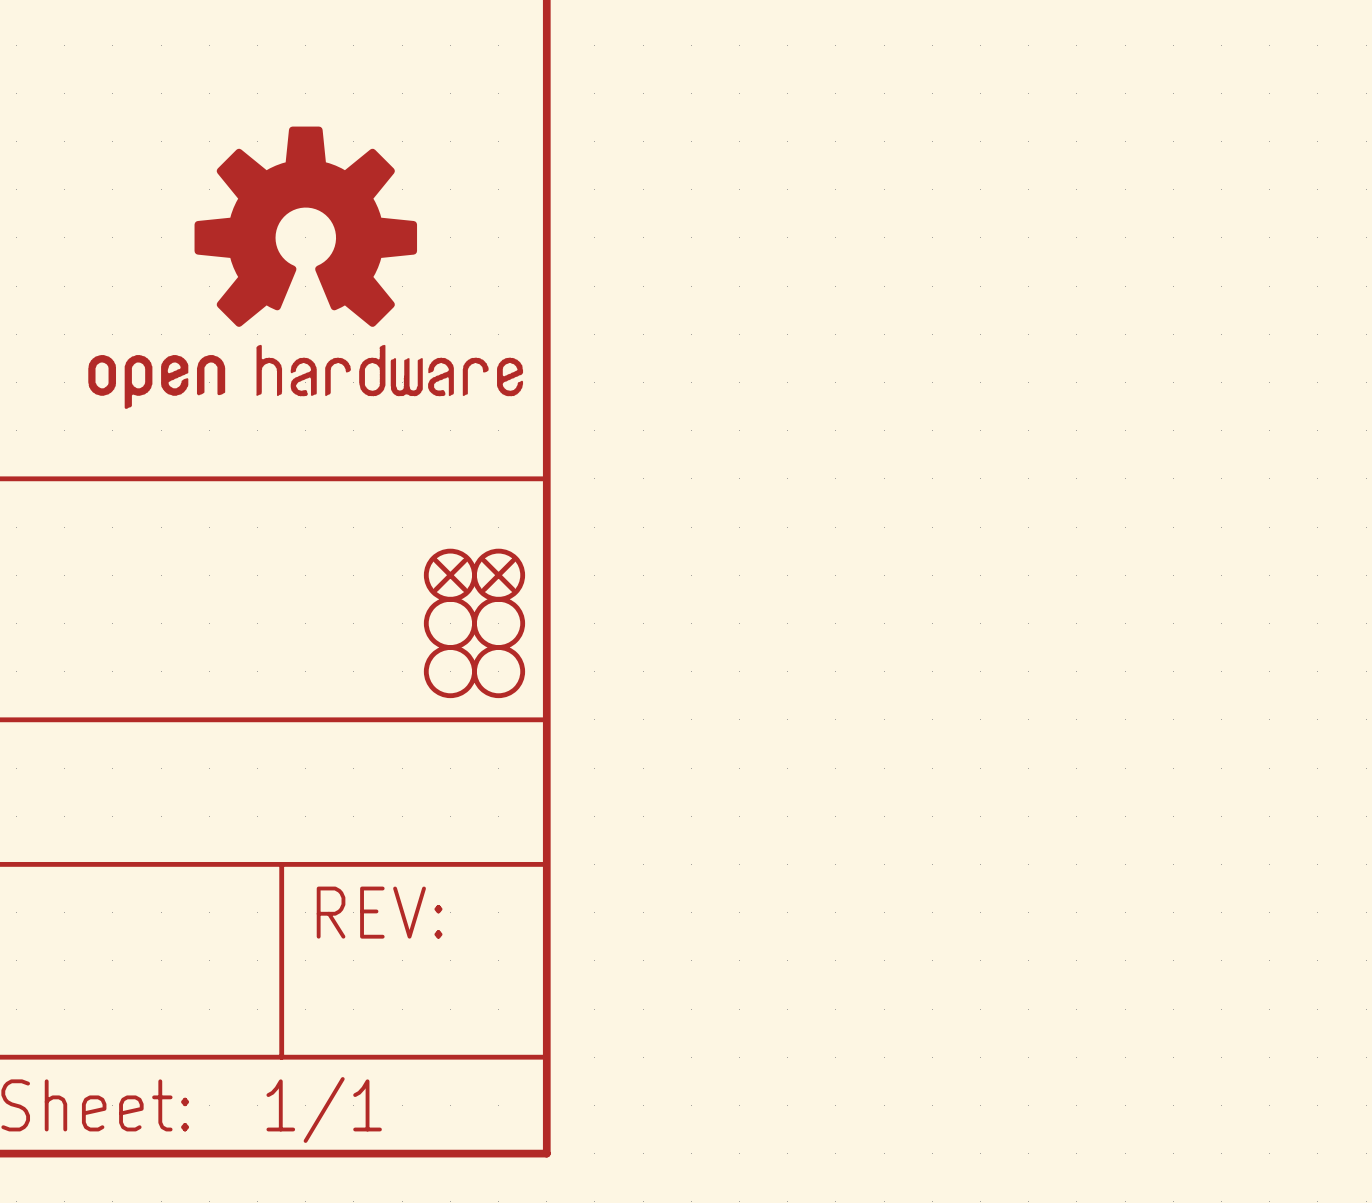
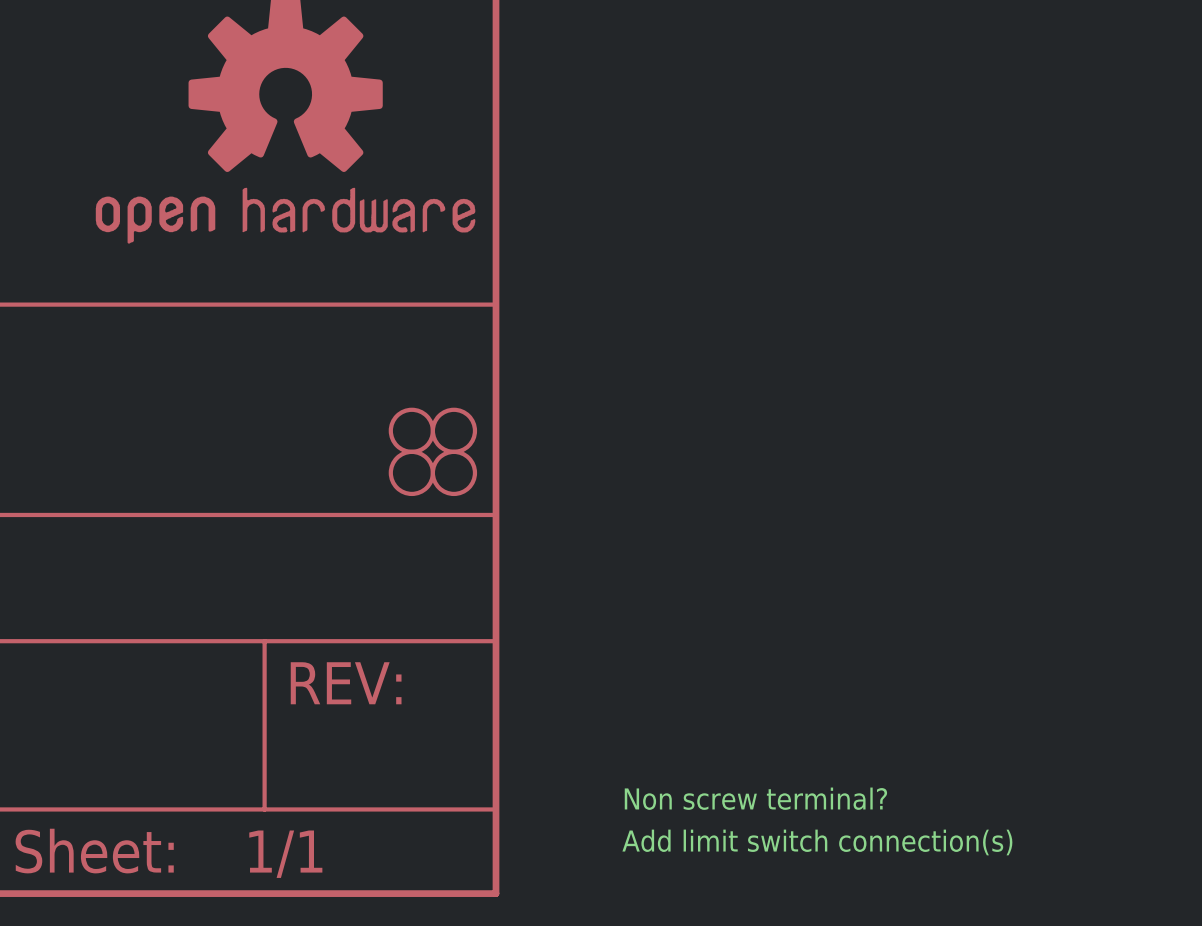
part: (450, 575) -> none
part: (498, 575) -> none
text: none -> Non screw terminal? (755, 798)
text: none -> Add limit switch connection(s) (817, 842)

